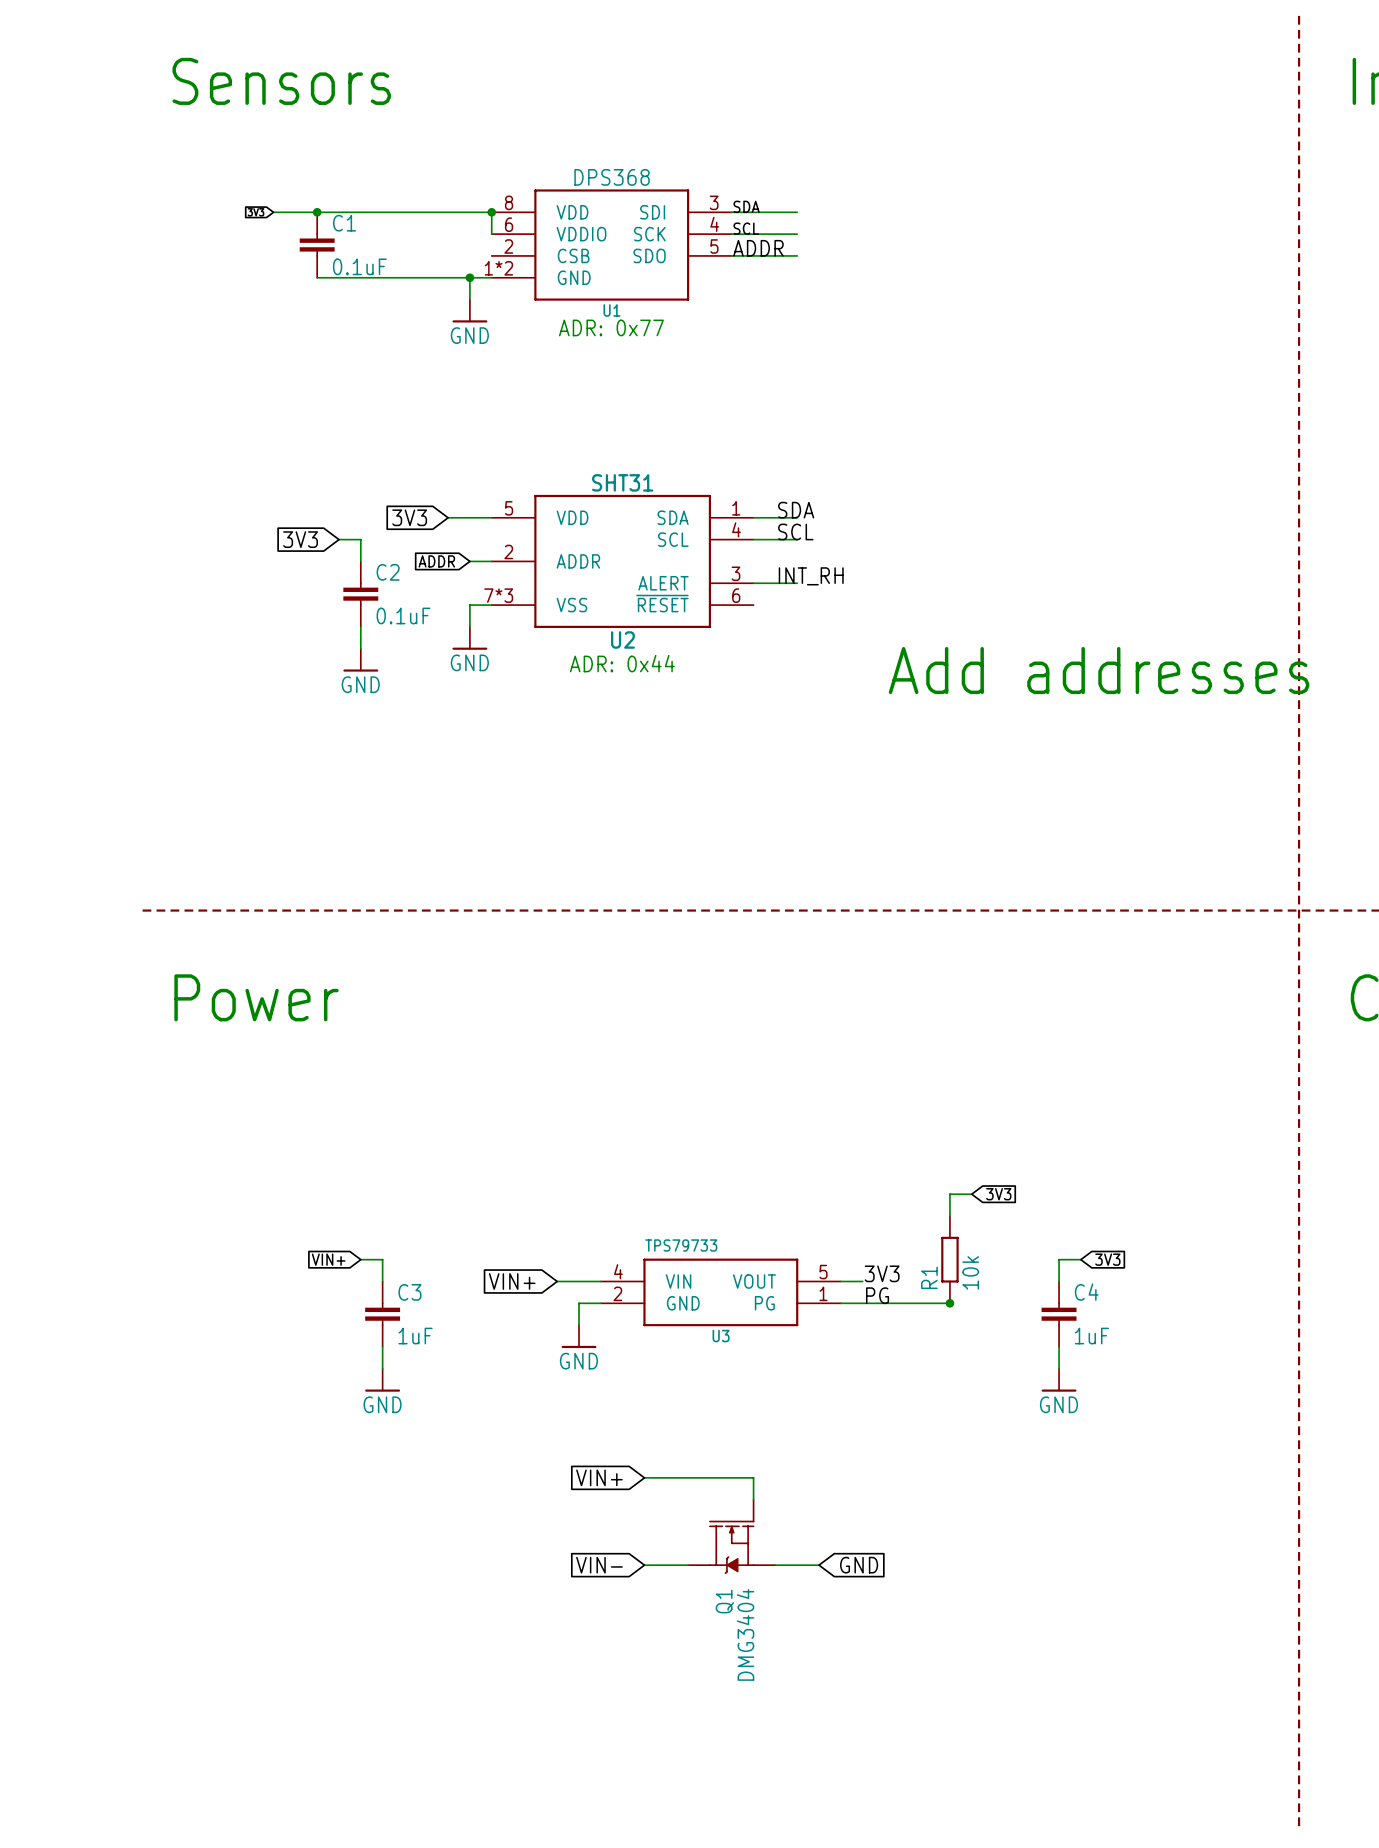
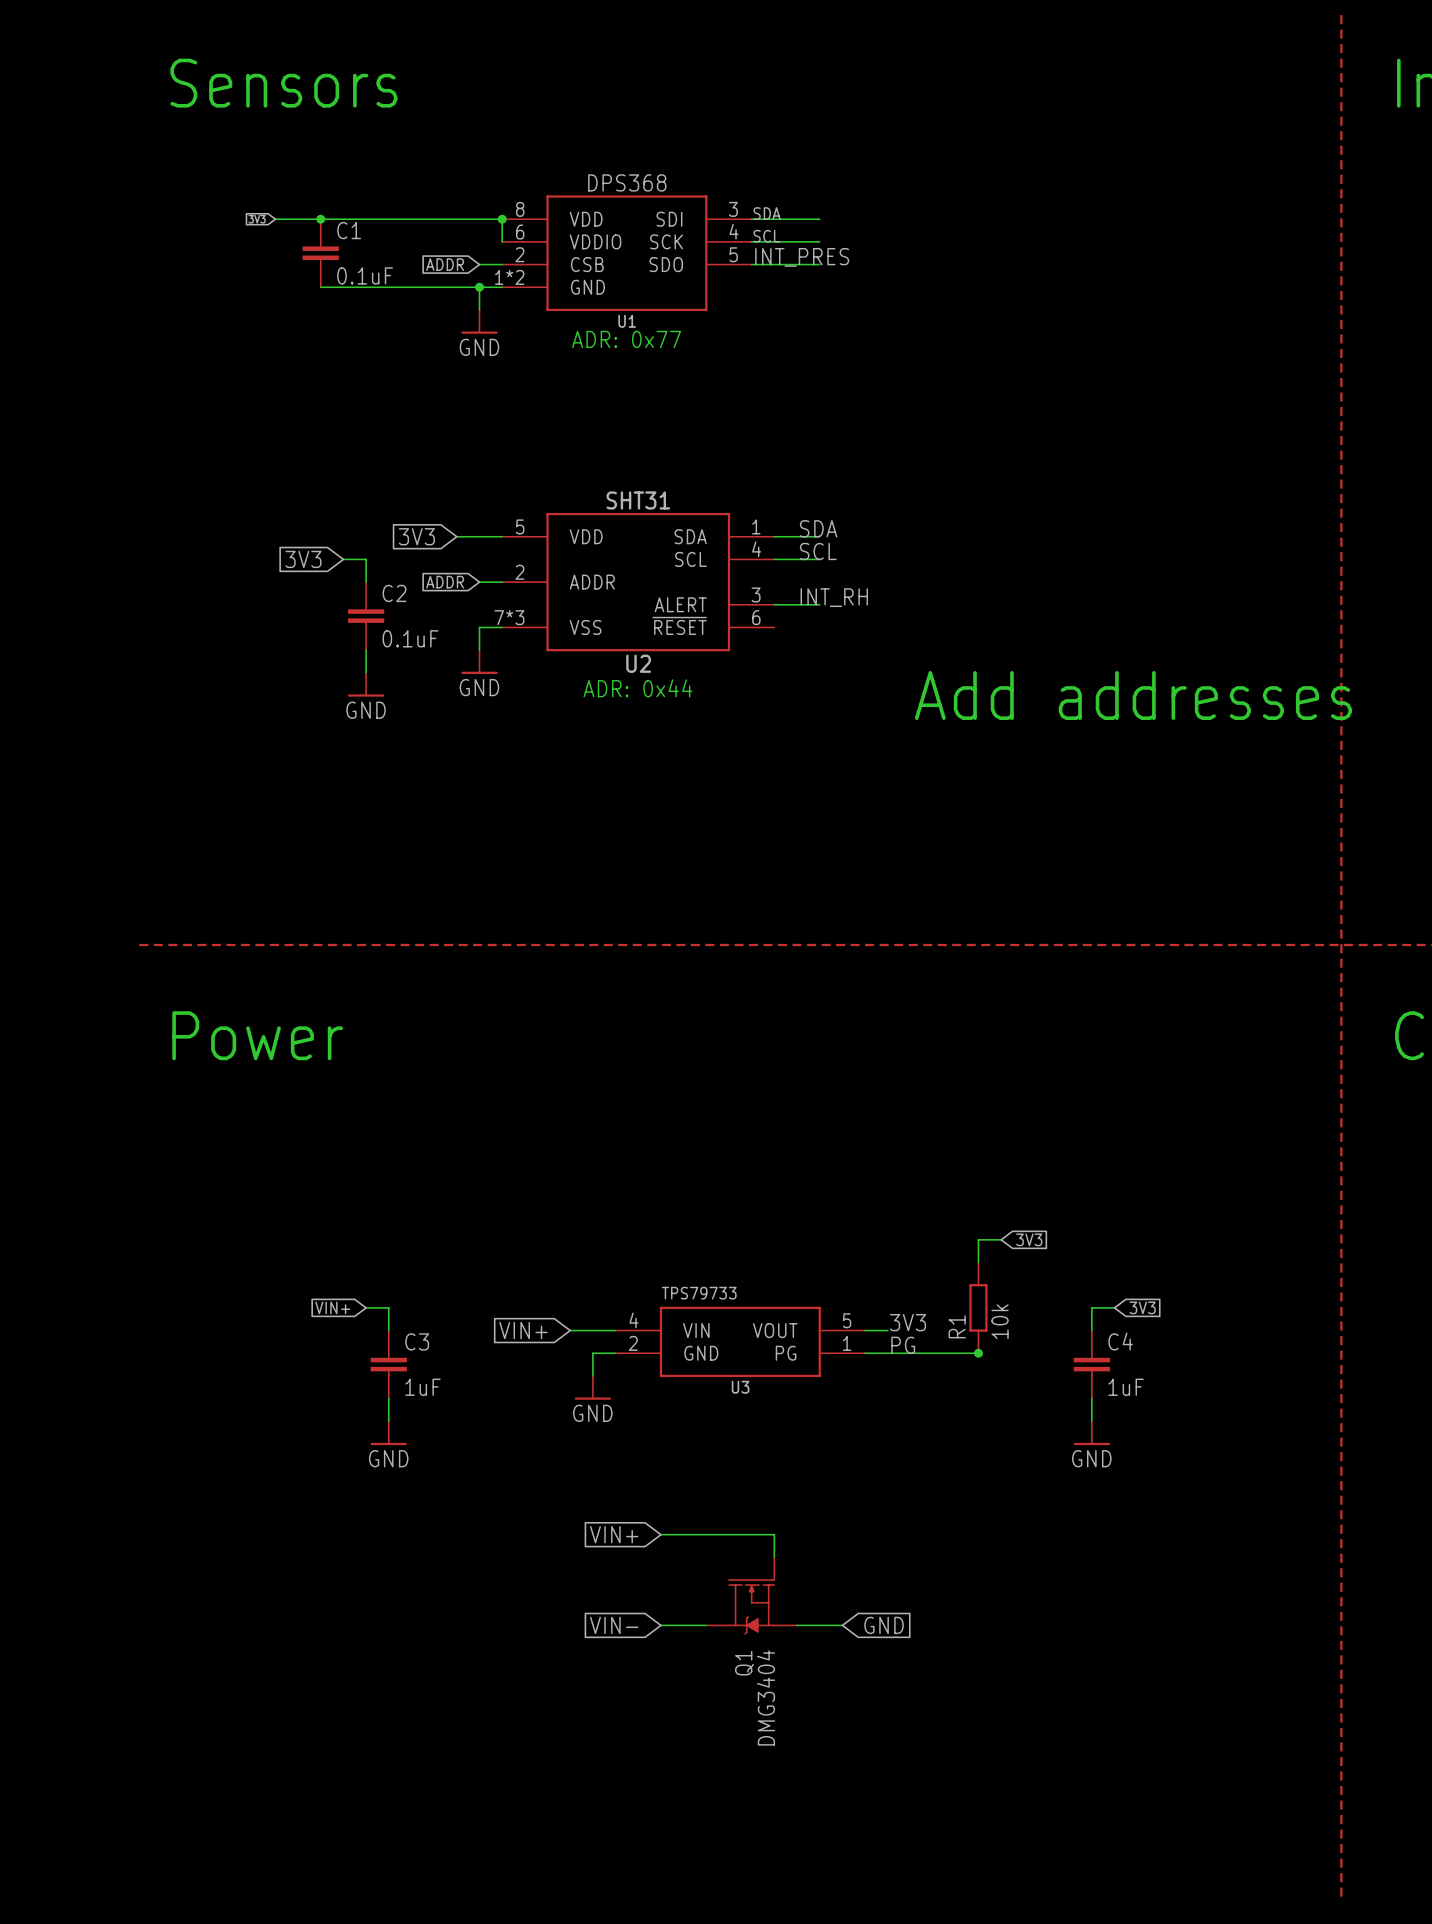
label: ADDR (758, 248) -> INT_PRES (802, 257)
global label: none -> ADDR (445, 264)
wire: none -> (479, 264) (502, 264)

